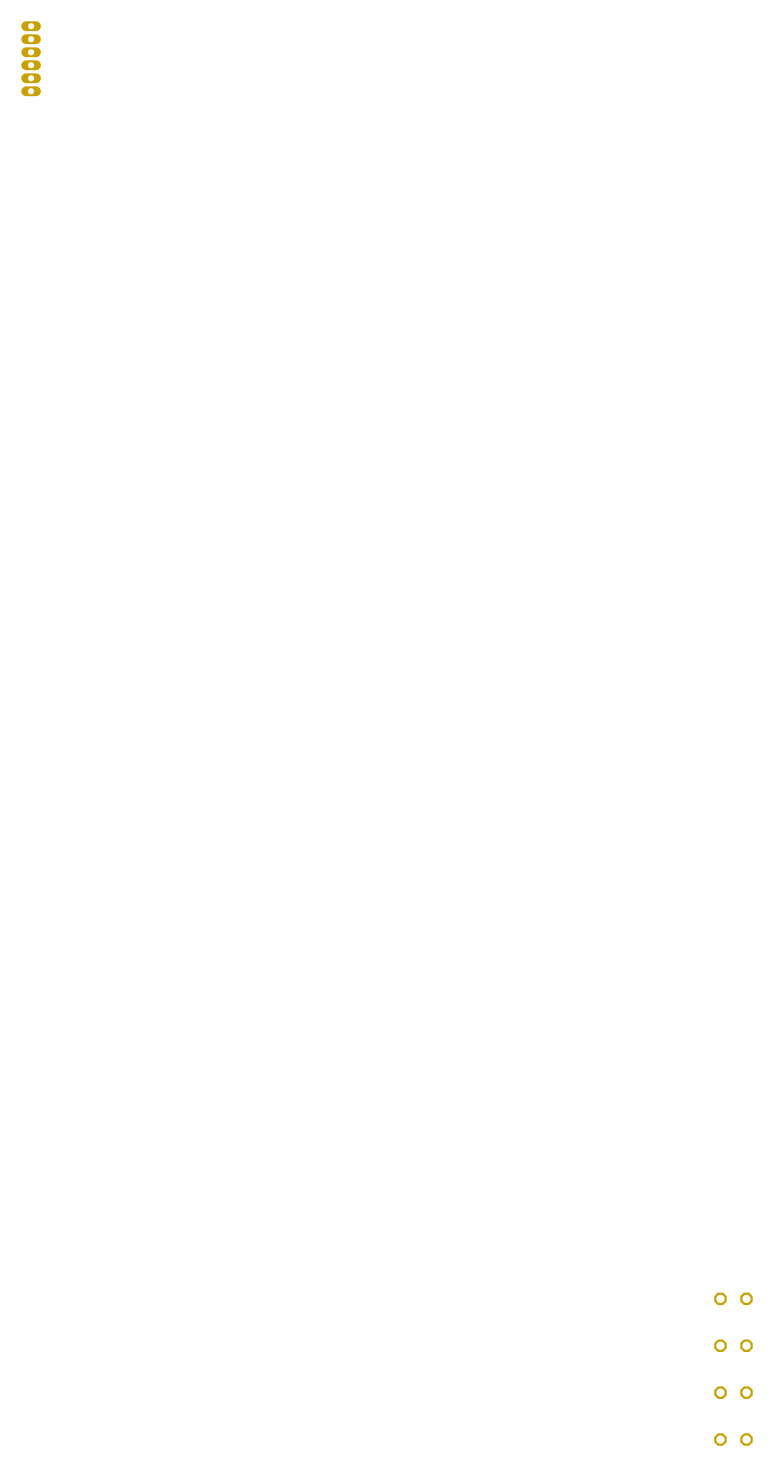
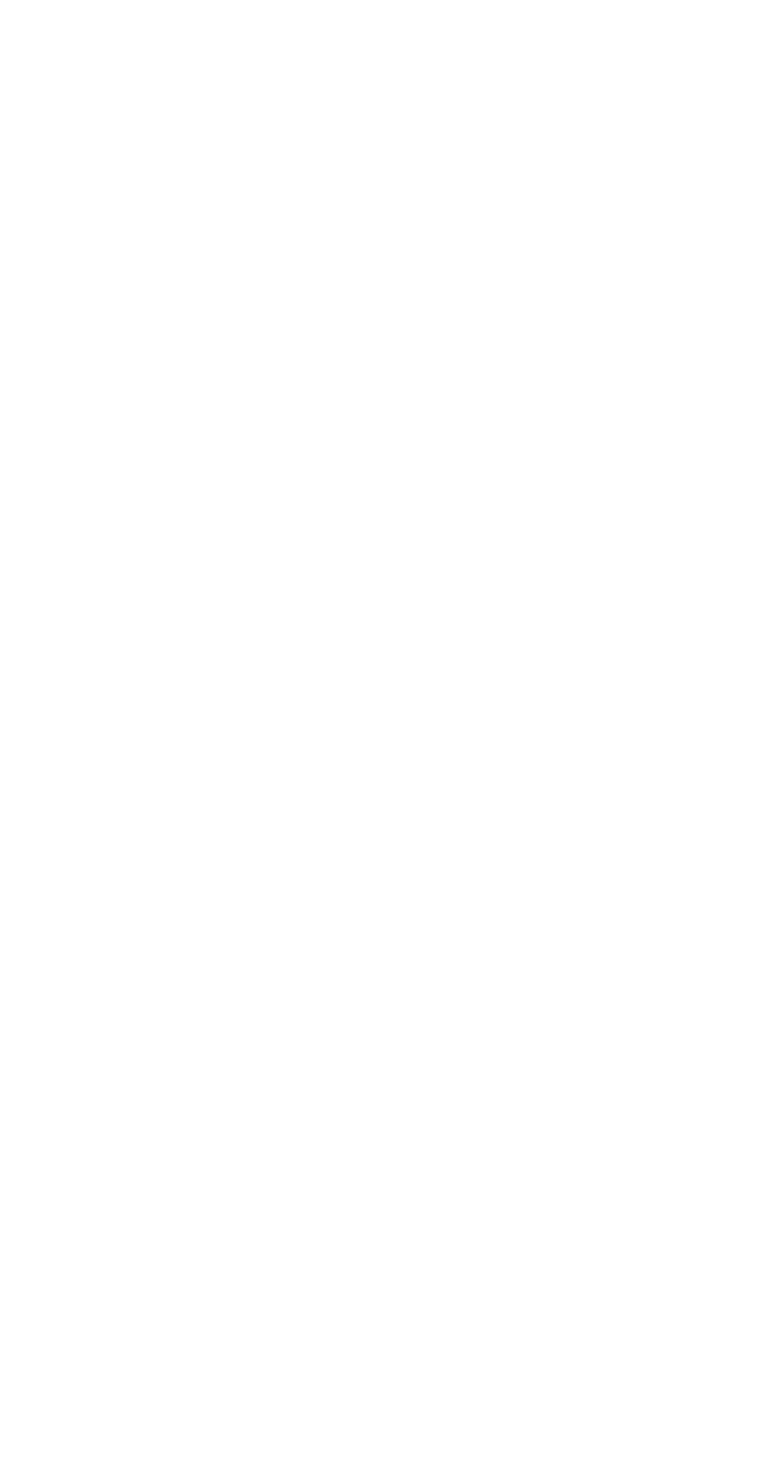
part: (31, 58) -> none
part: (733, 1298) -> none
part: (733, 1345) -> none
part: (733, 1392) -> none
part: (733, 1439) -> none

